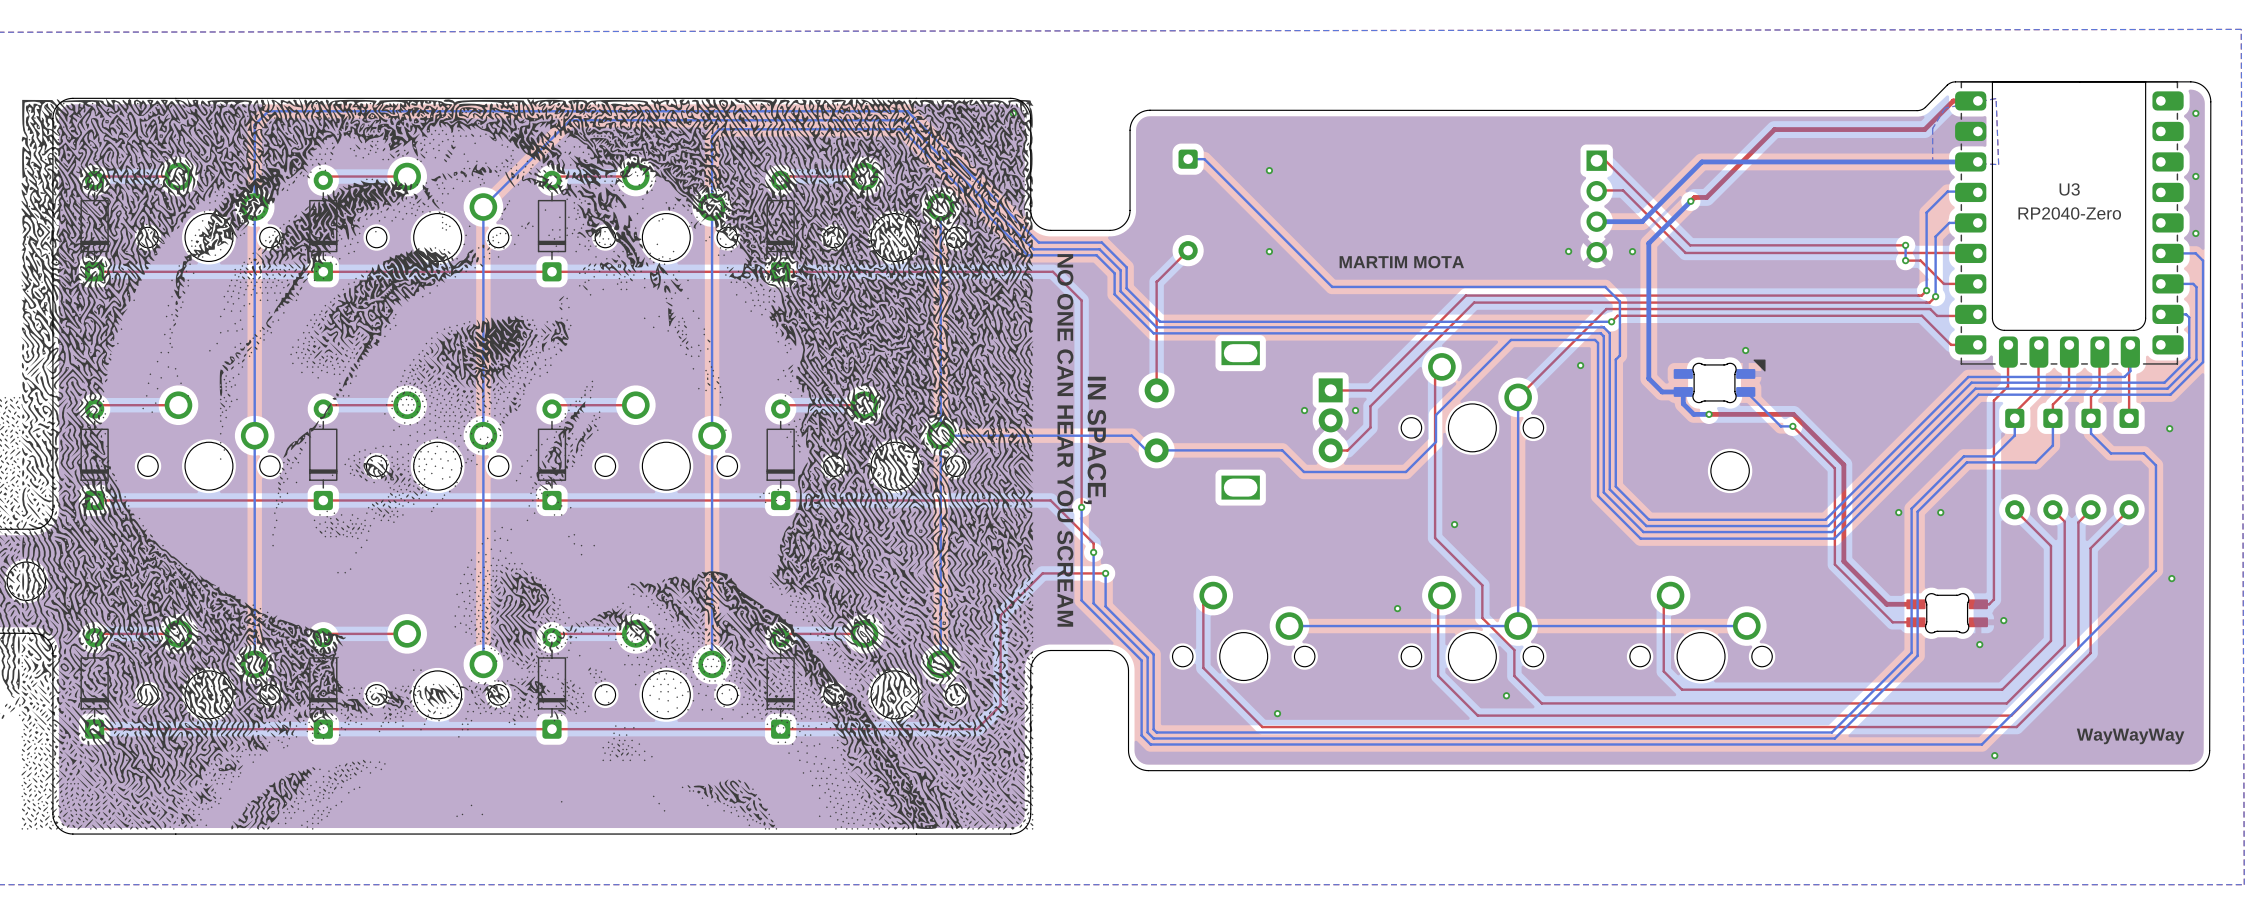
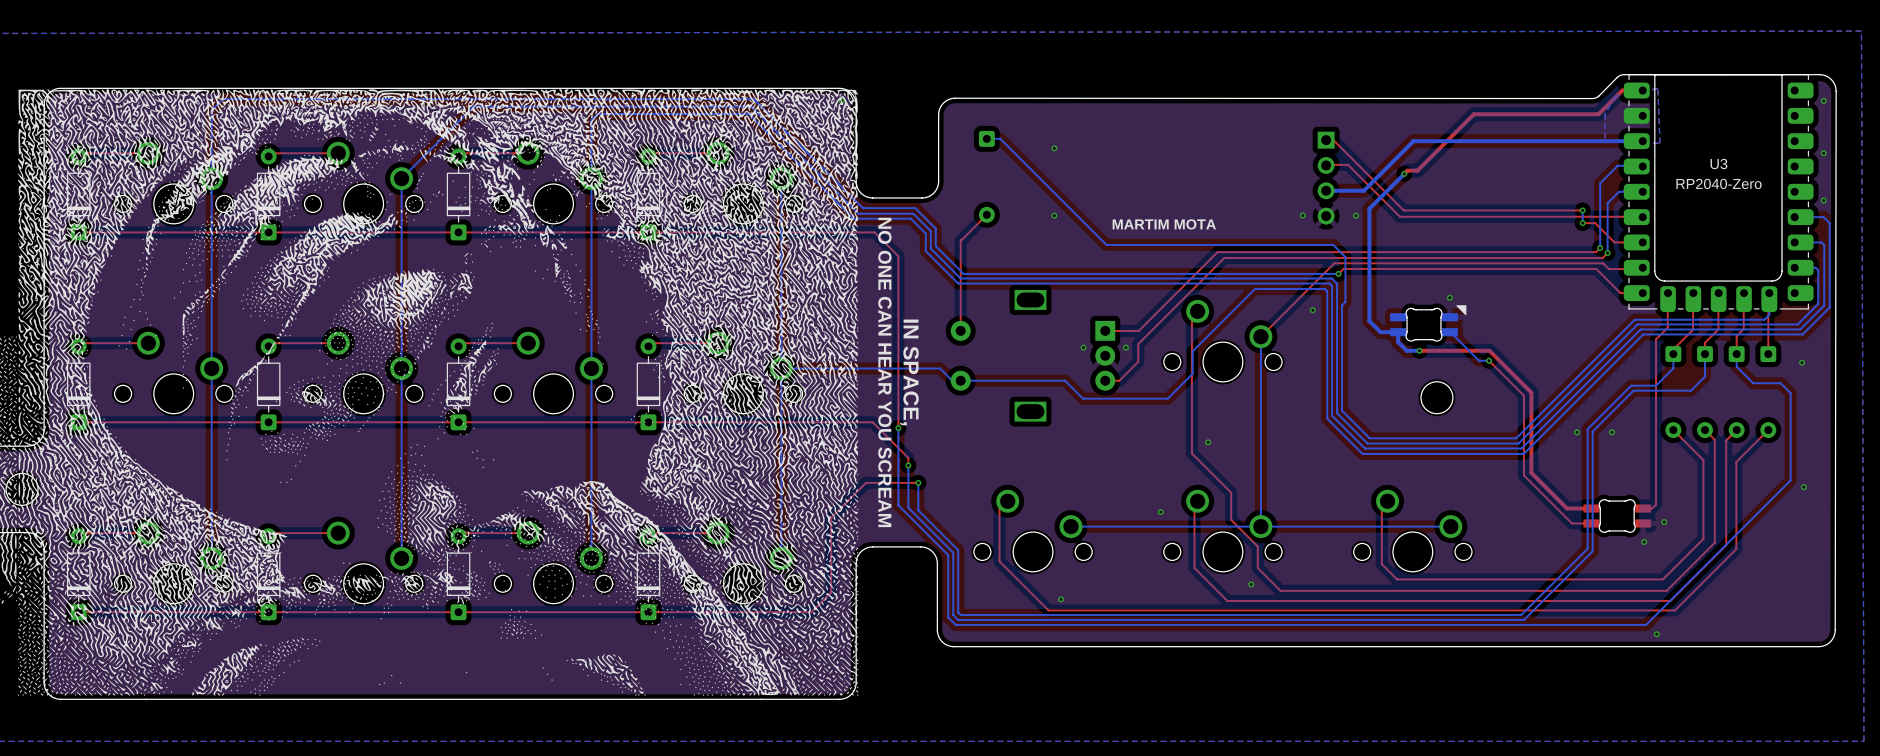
text: WayWayWay (2130, 736) -> none

